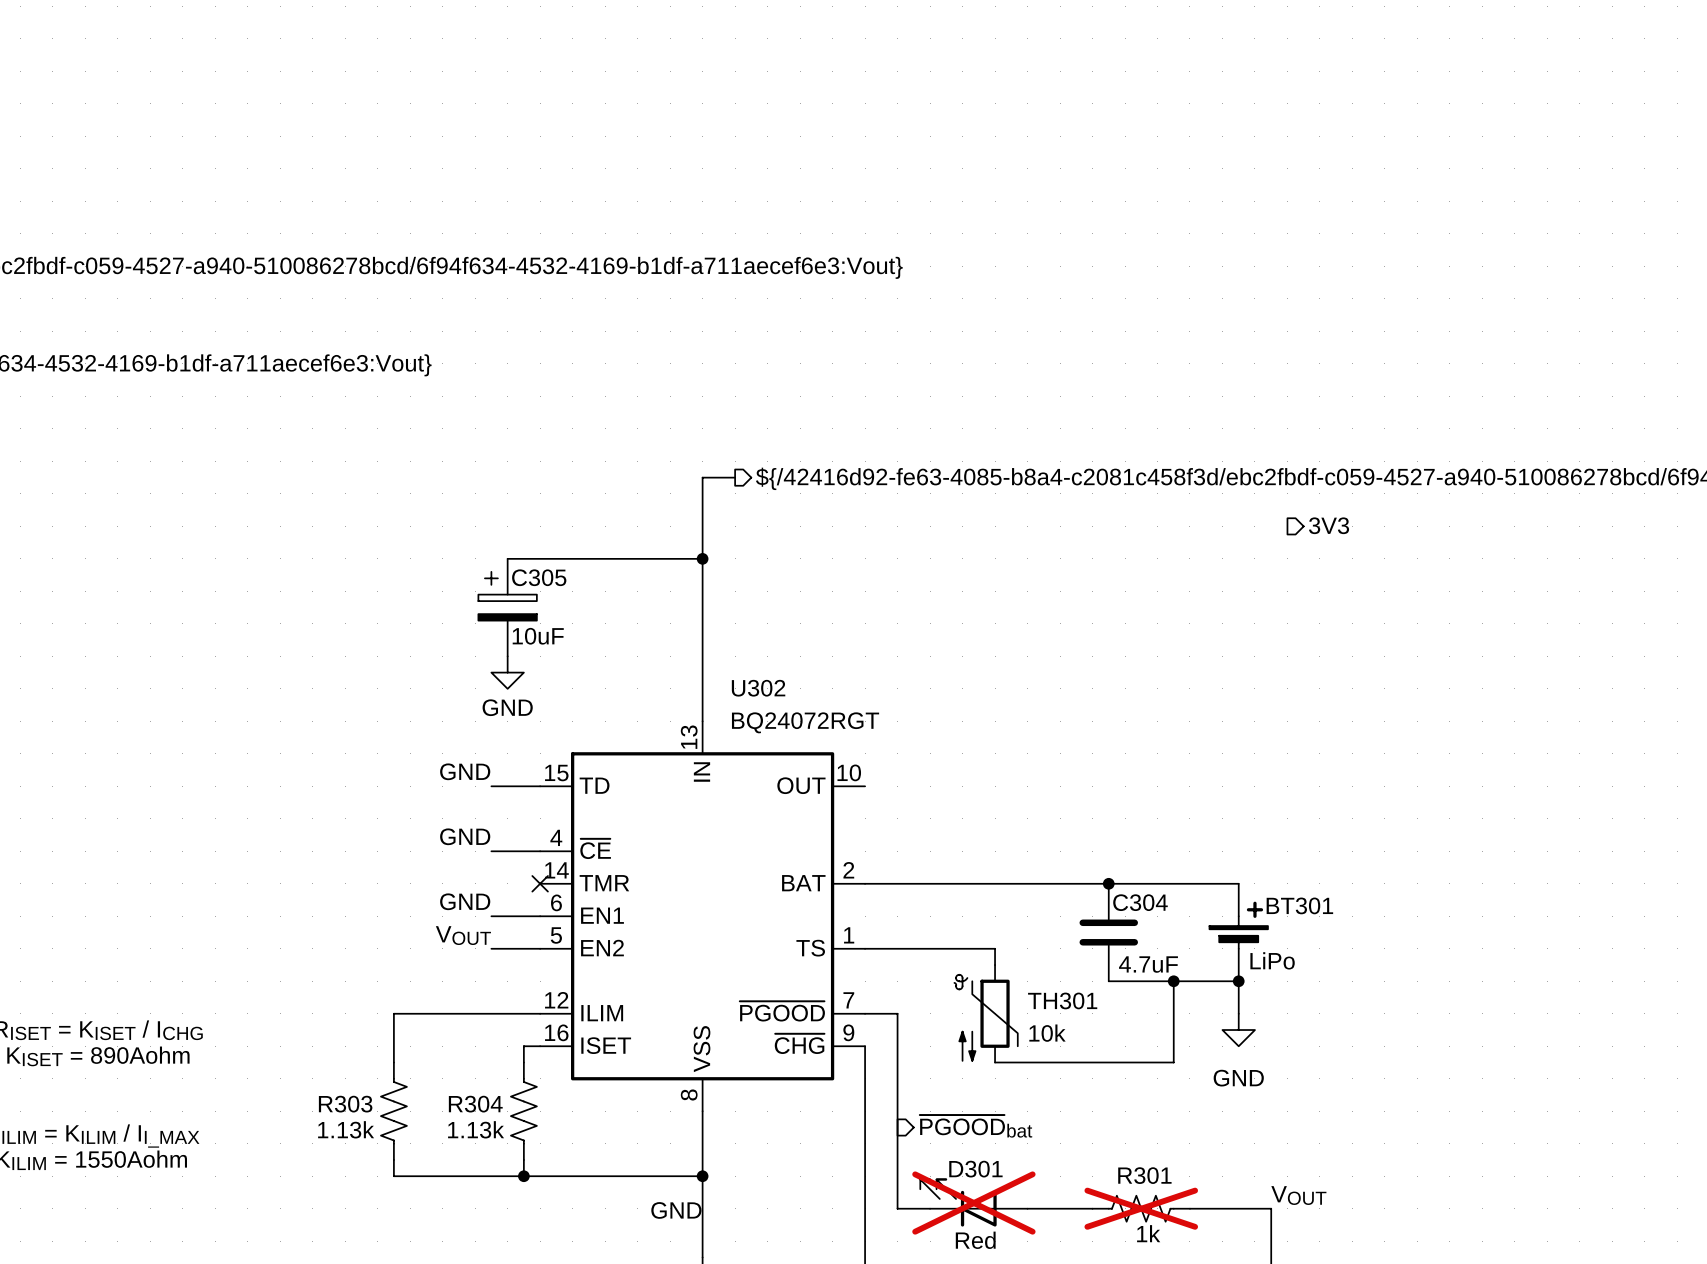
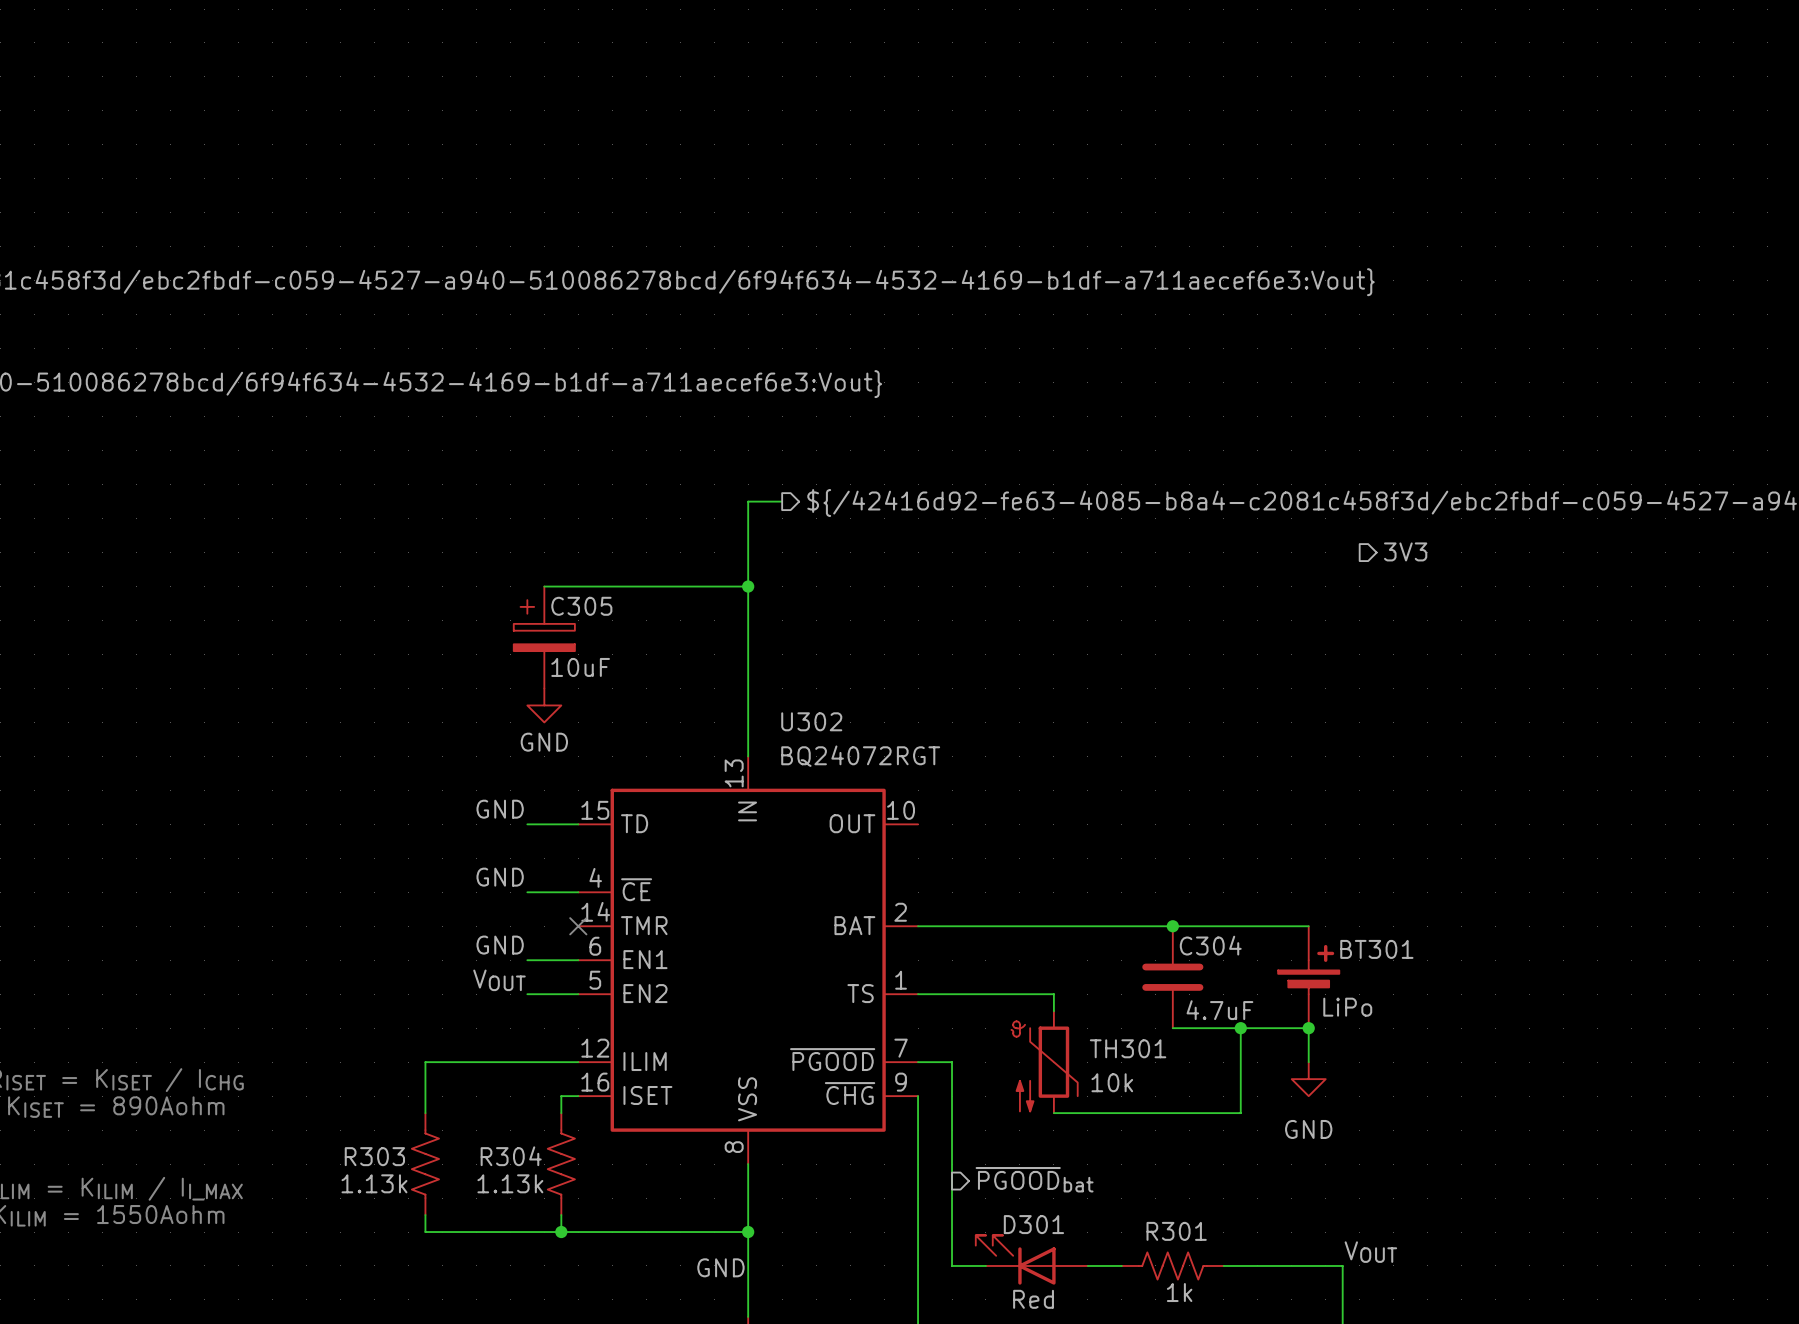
D301 do-not-place cross: (973, 1203) -> none
R301 position: (1141, 1208) -> (1172, 1265)
R301 do-not-place cross: (1141, 1208) -> none

